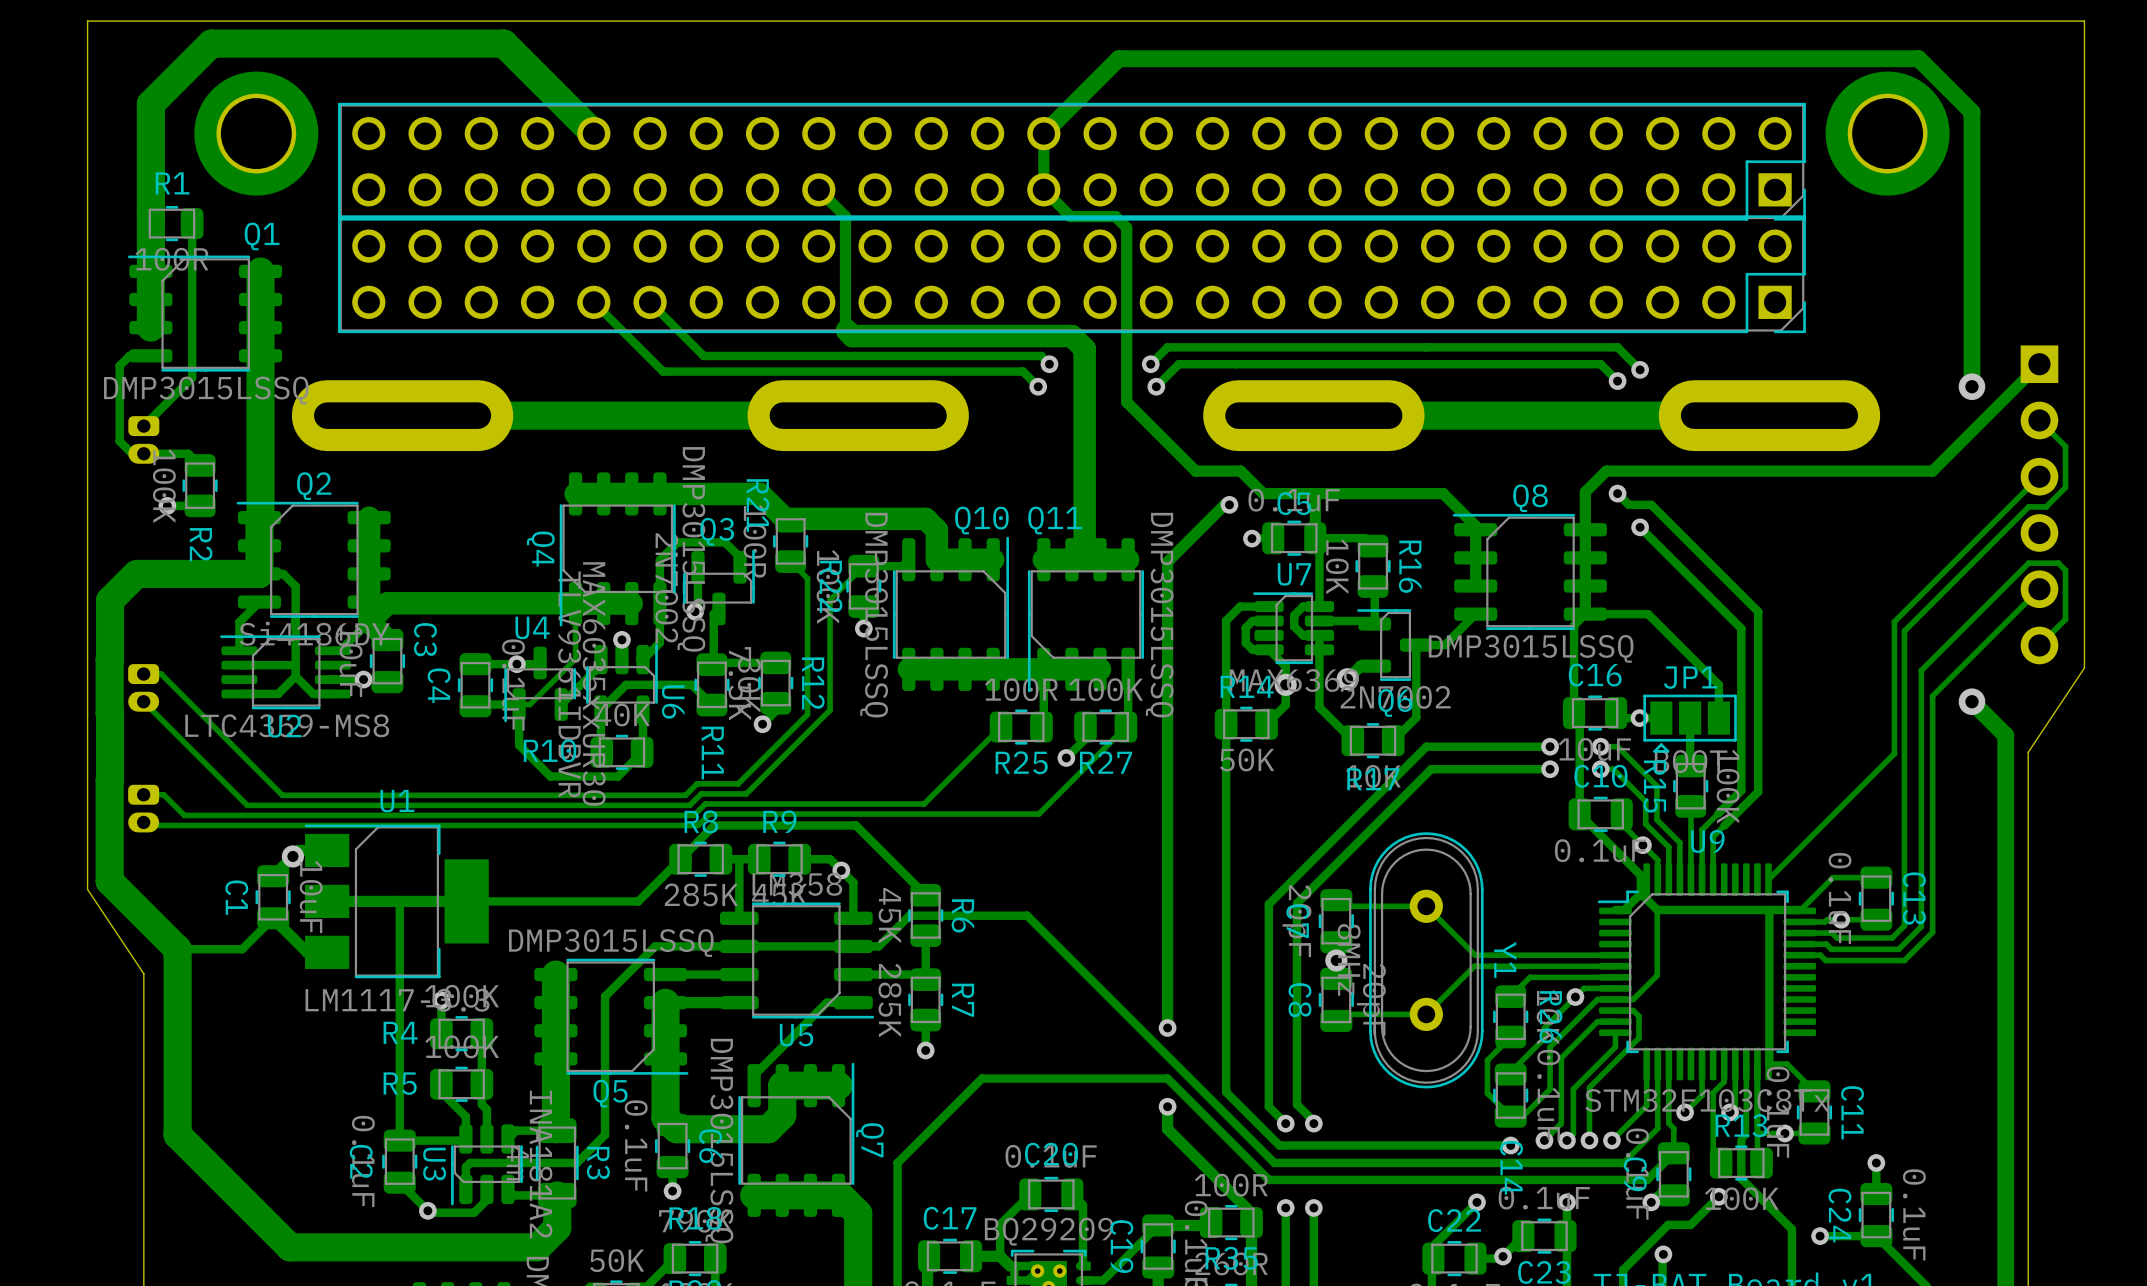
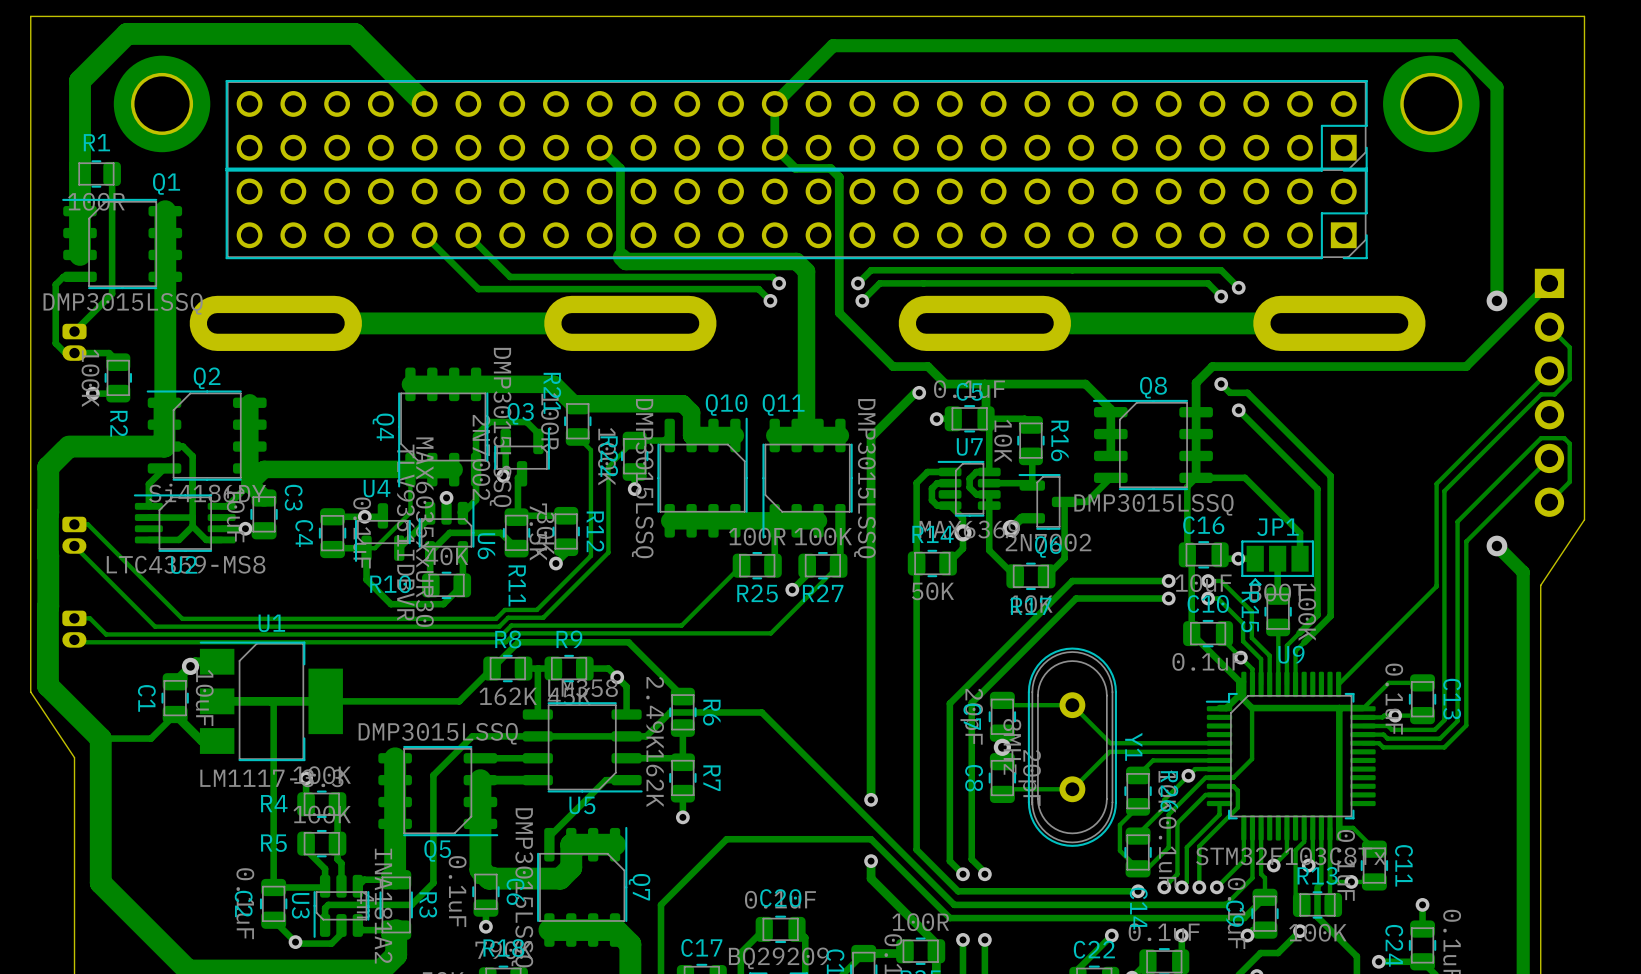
R8 value: 285K (701, 894) -> 162K (508, 696)
R6 value: 45K (889, 915) -> 2.49K (655, 712)
R7 value: 285K (890, 1000) -> 162K (655, 778)

